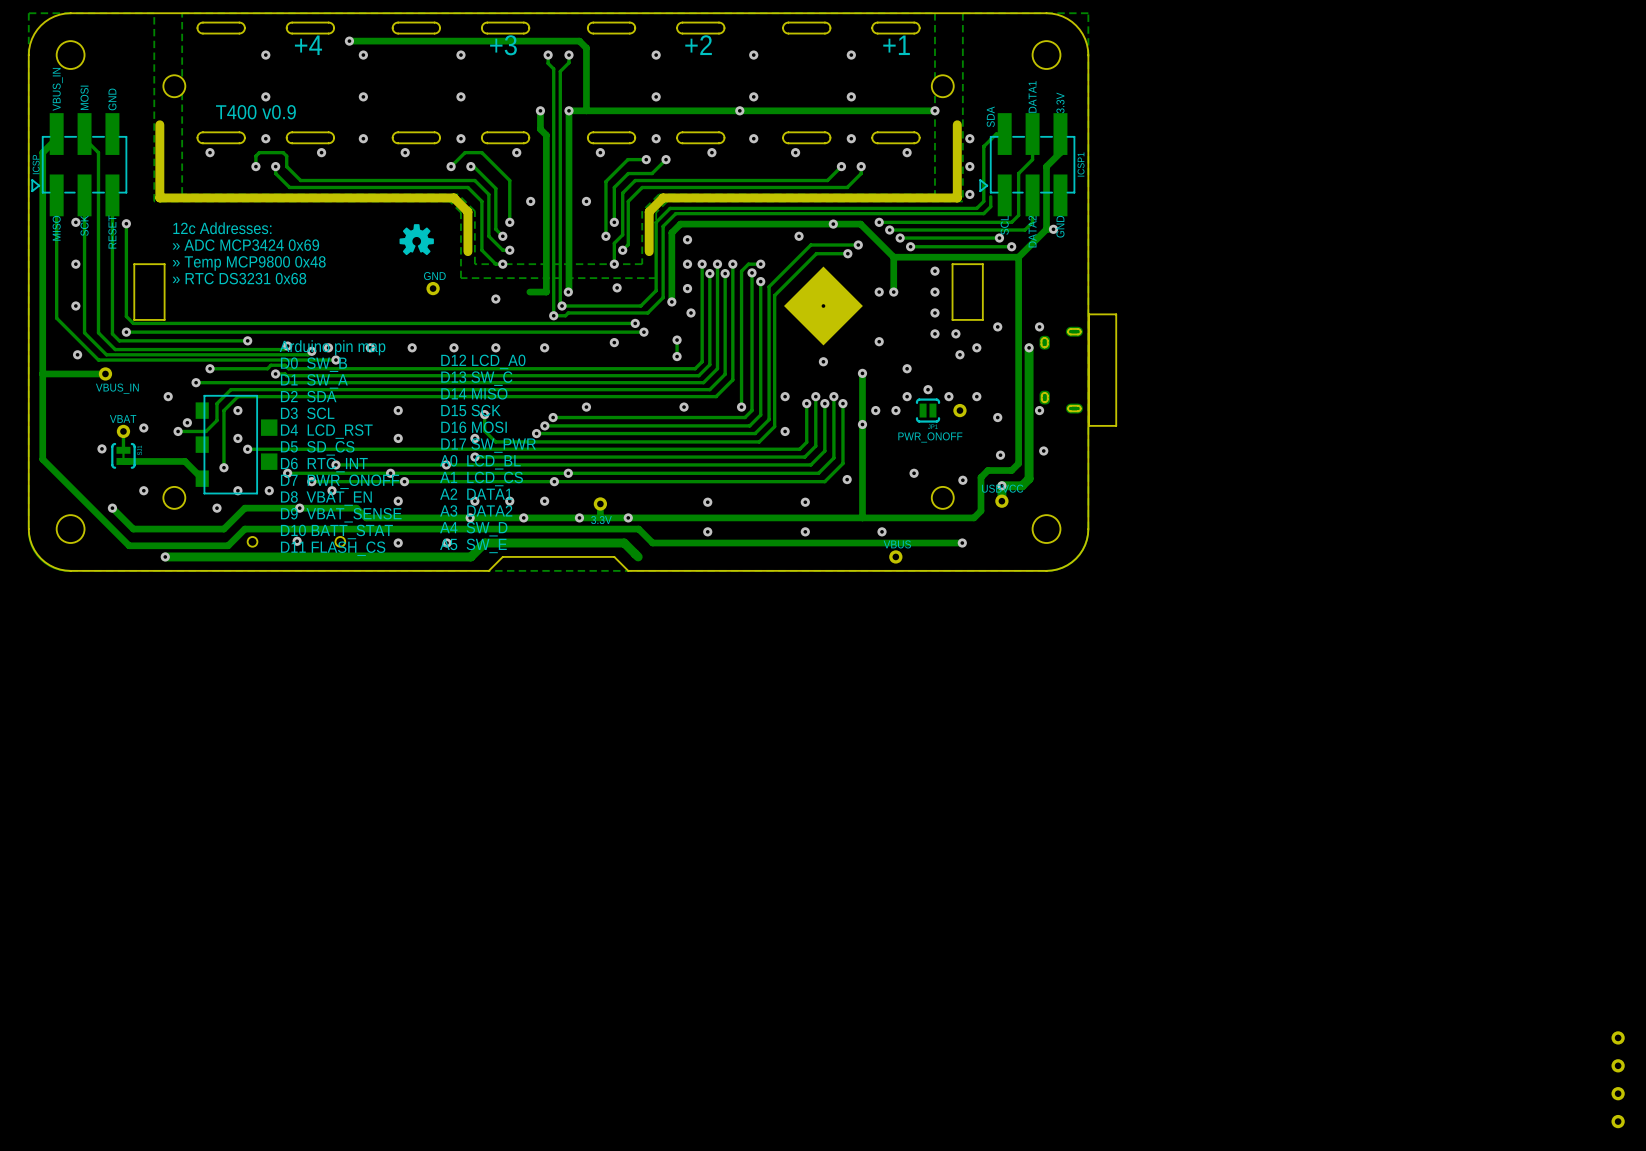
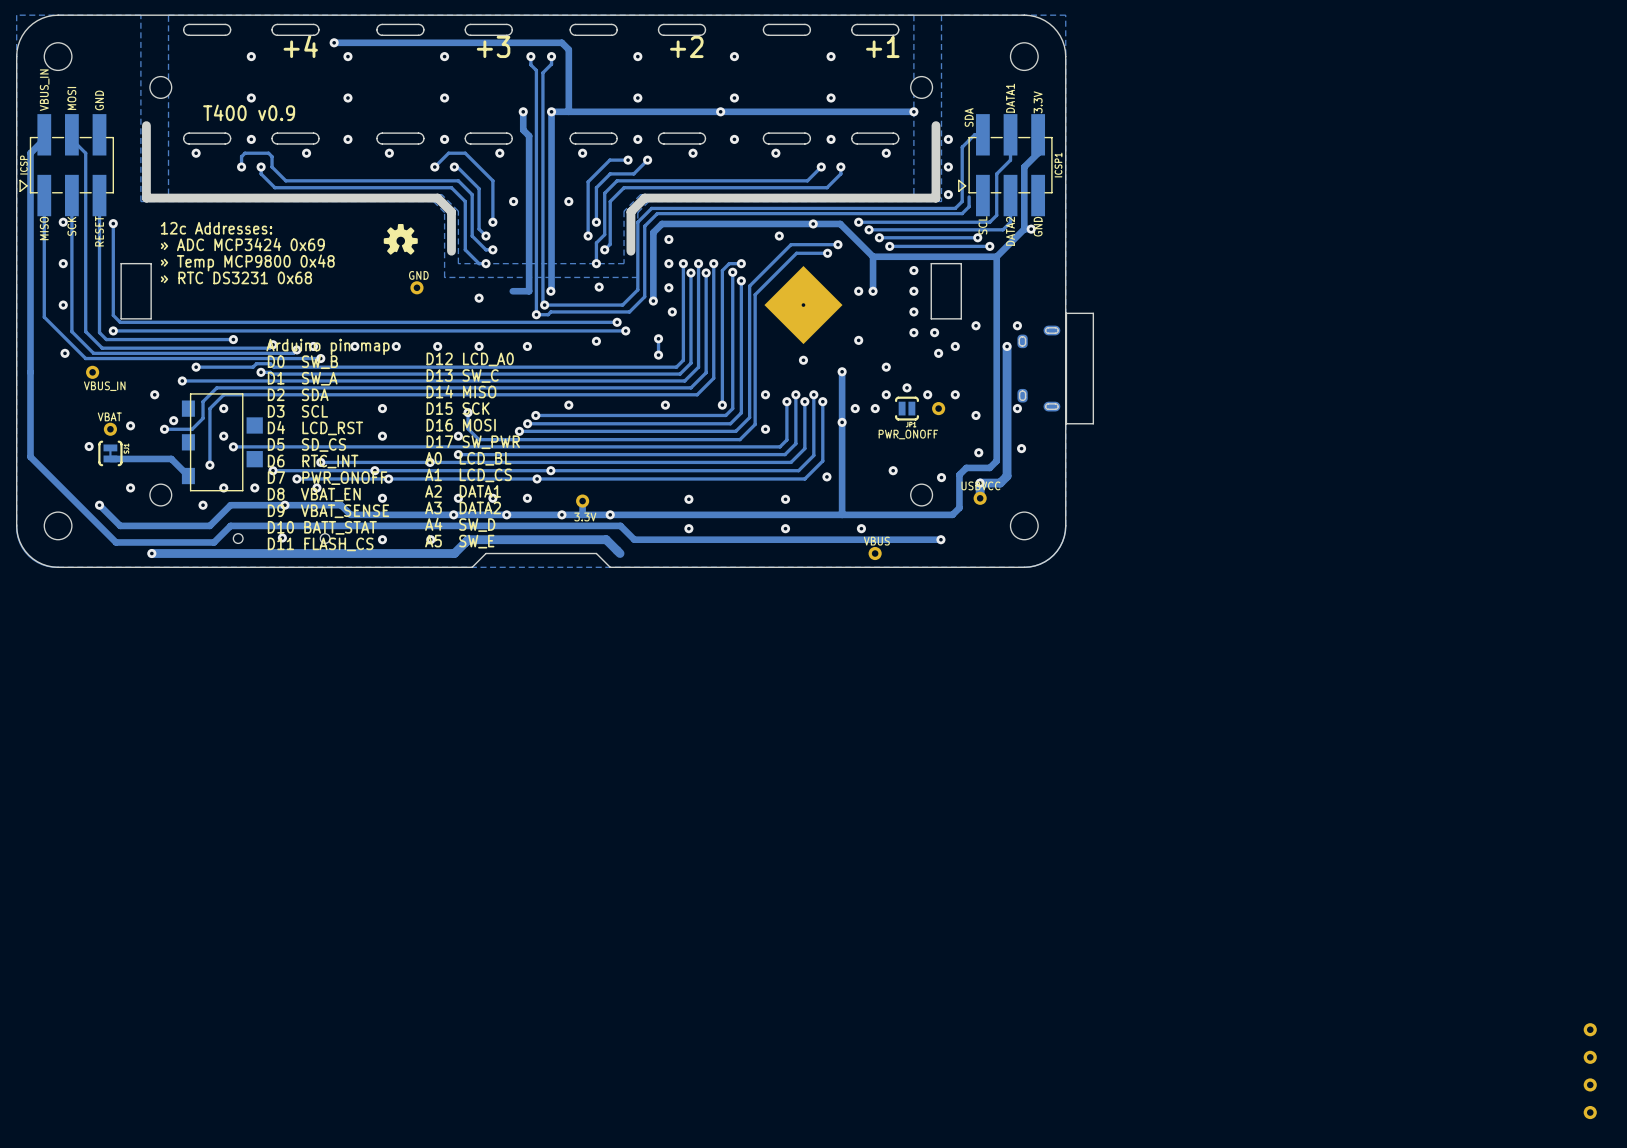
track: (105, 373) (42, 373) -> none
track: (123, 431) (123, 450) -> none

